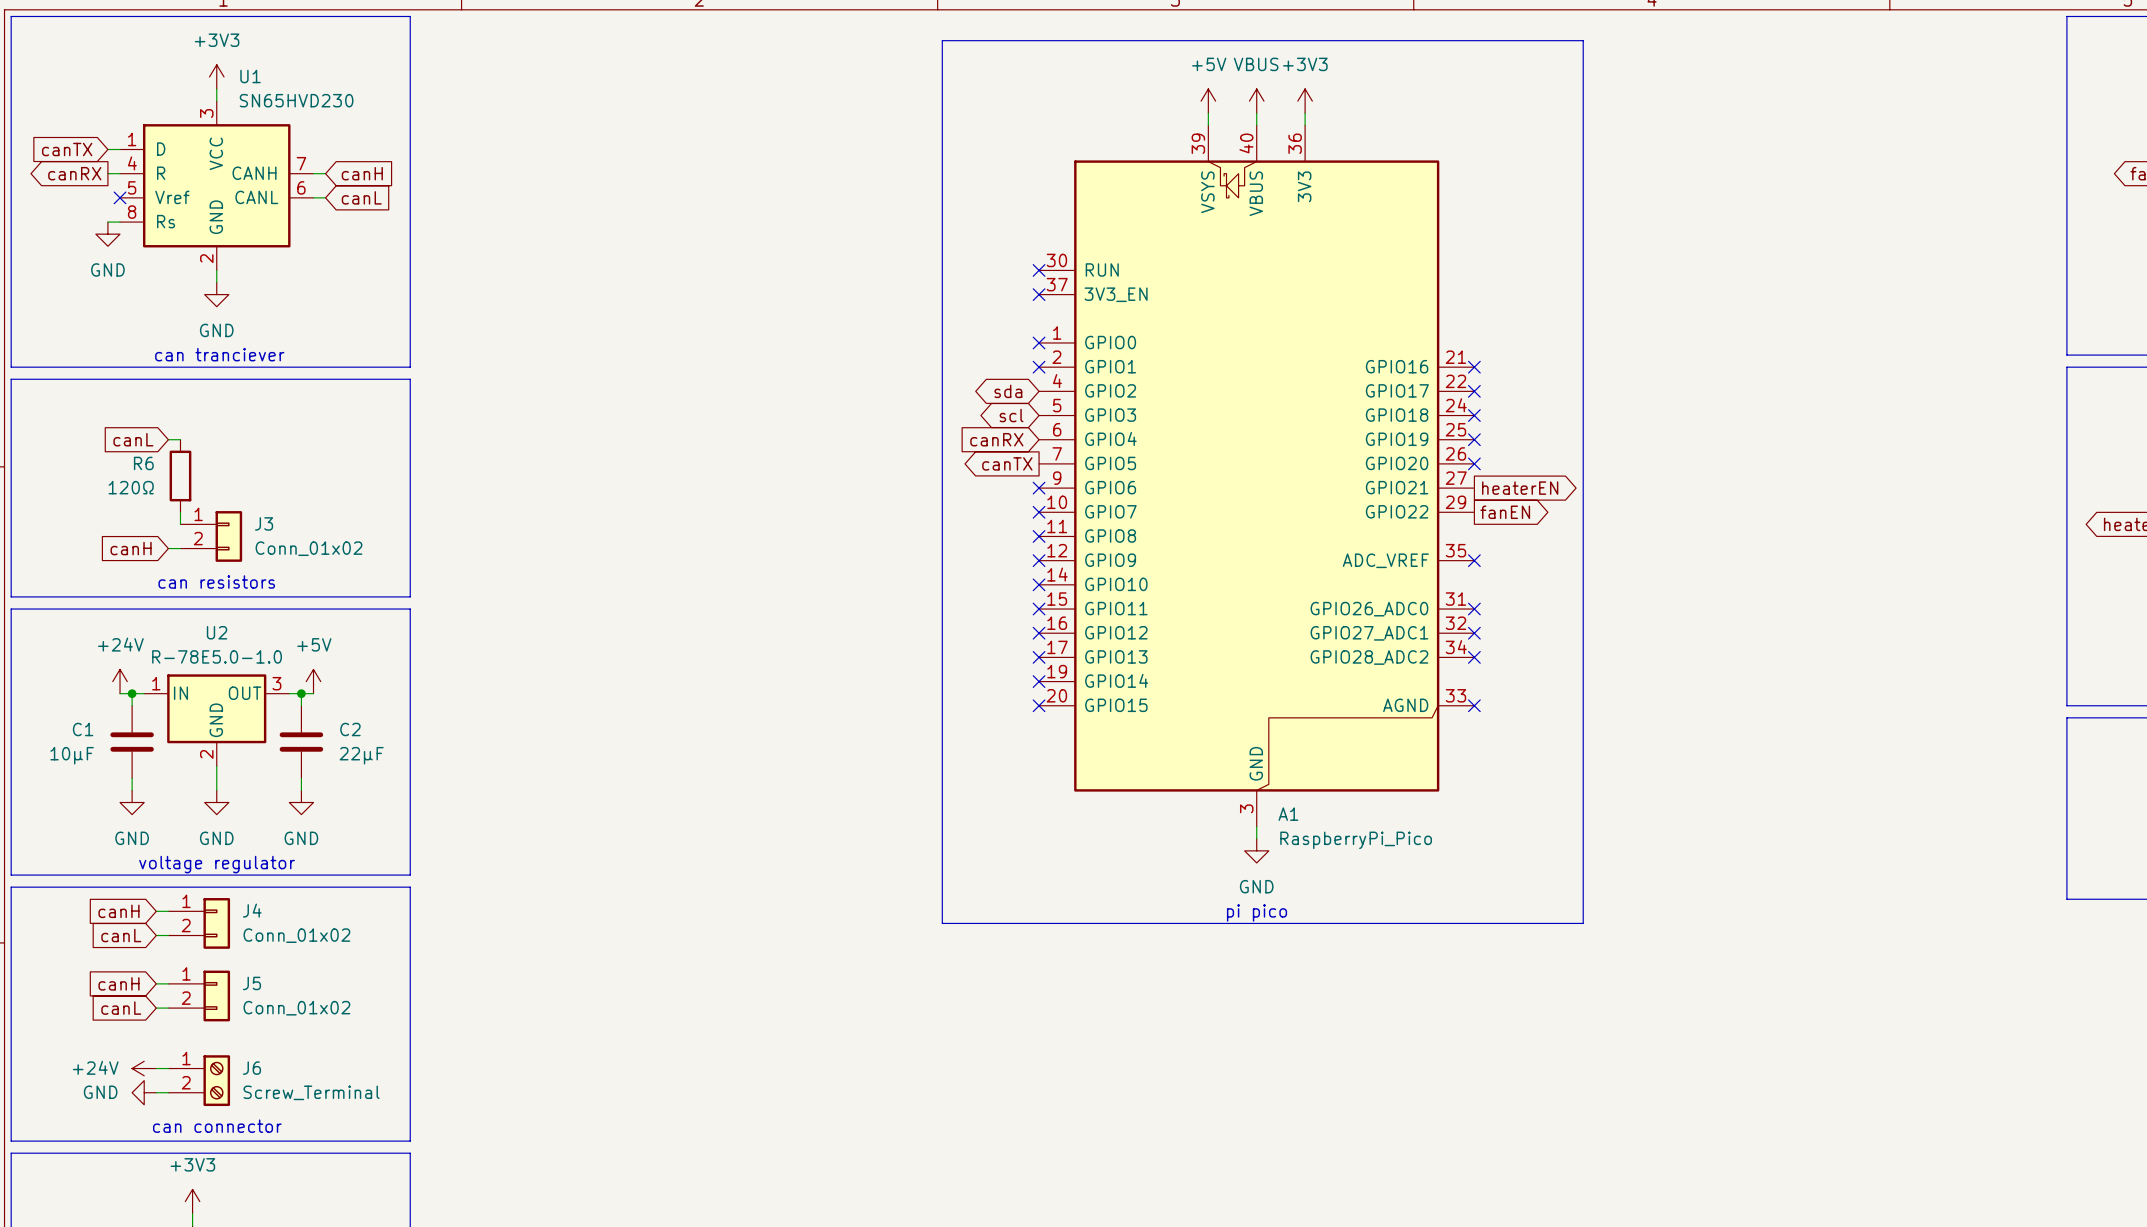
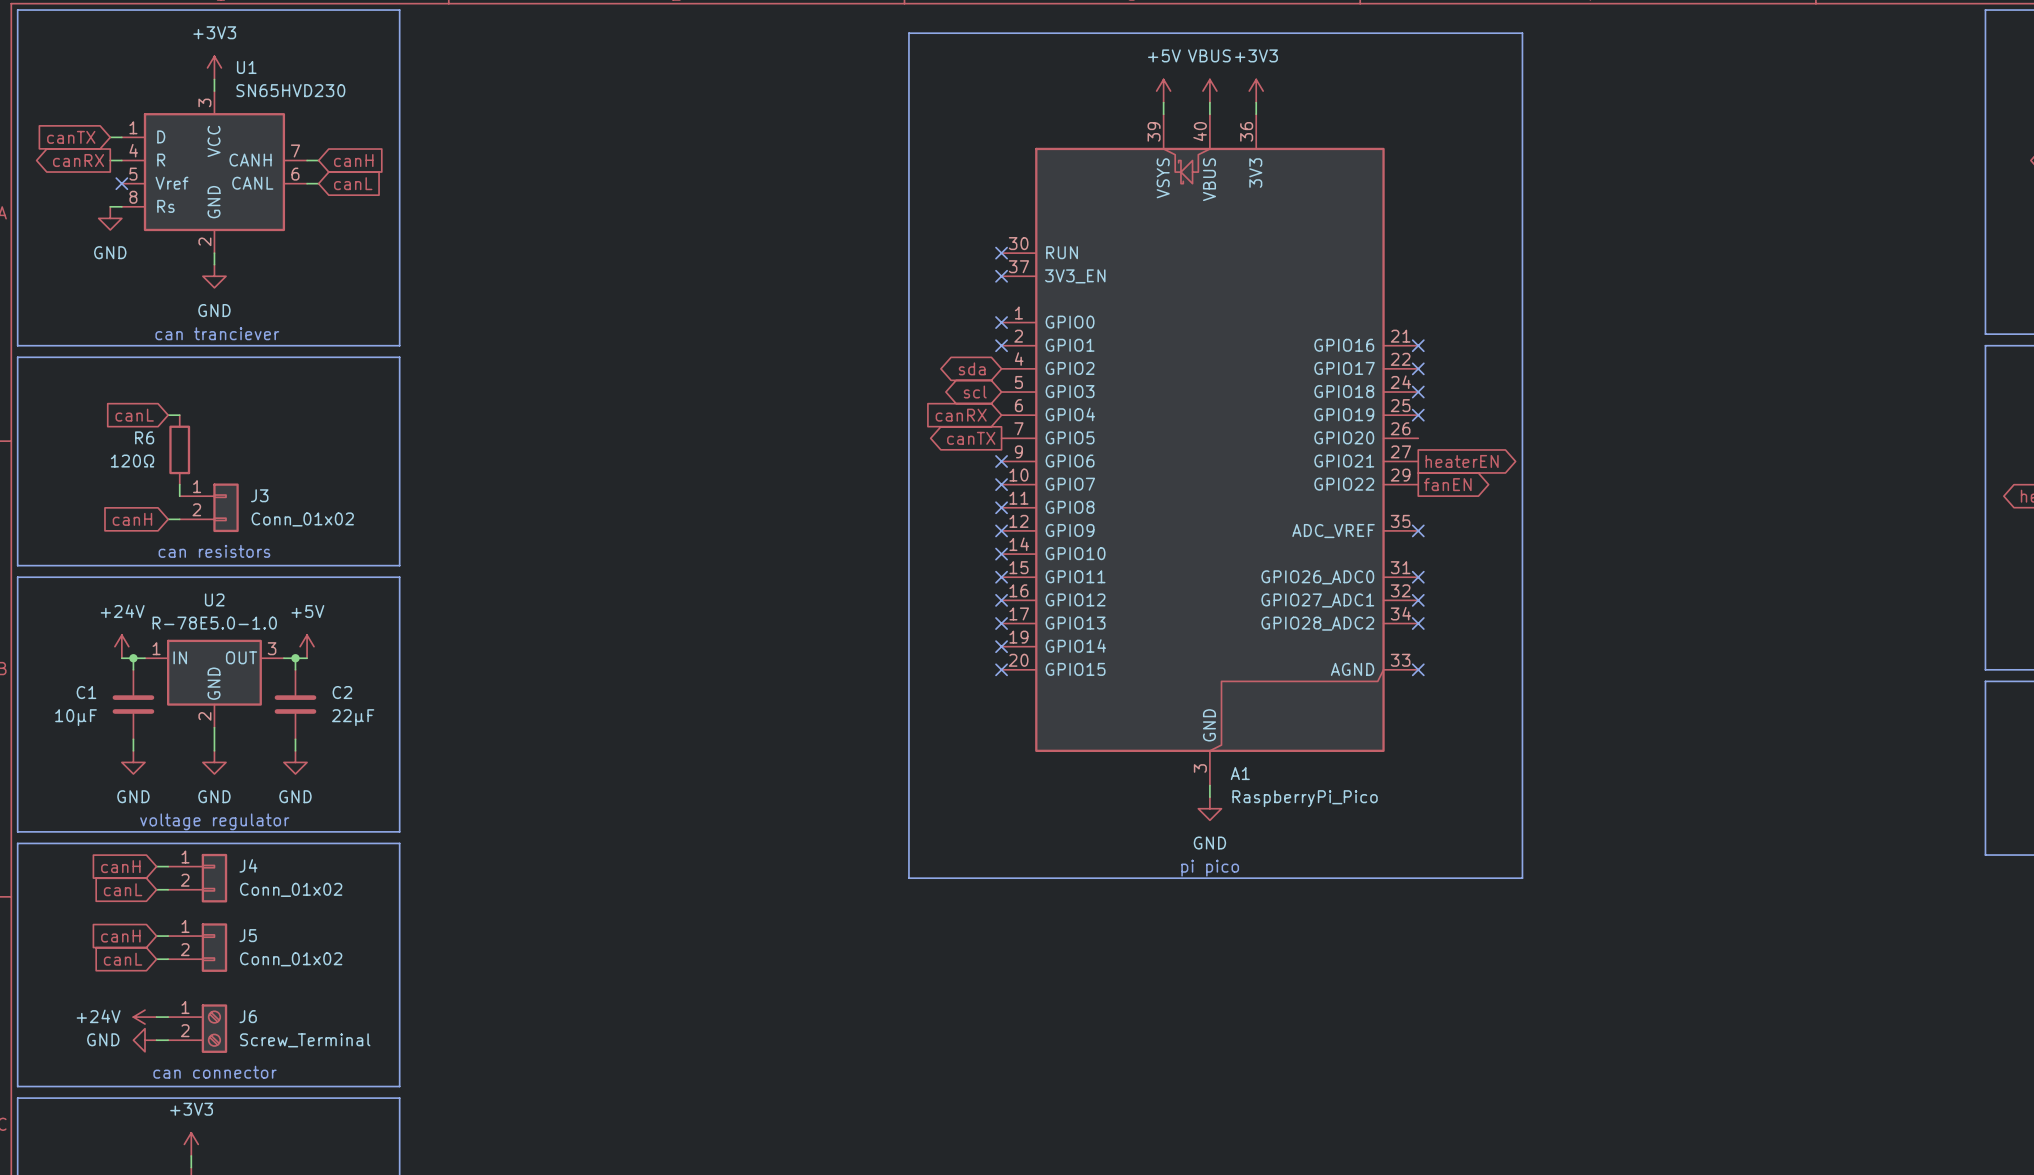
no-connect mark: (1474, 463) -> none

